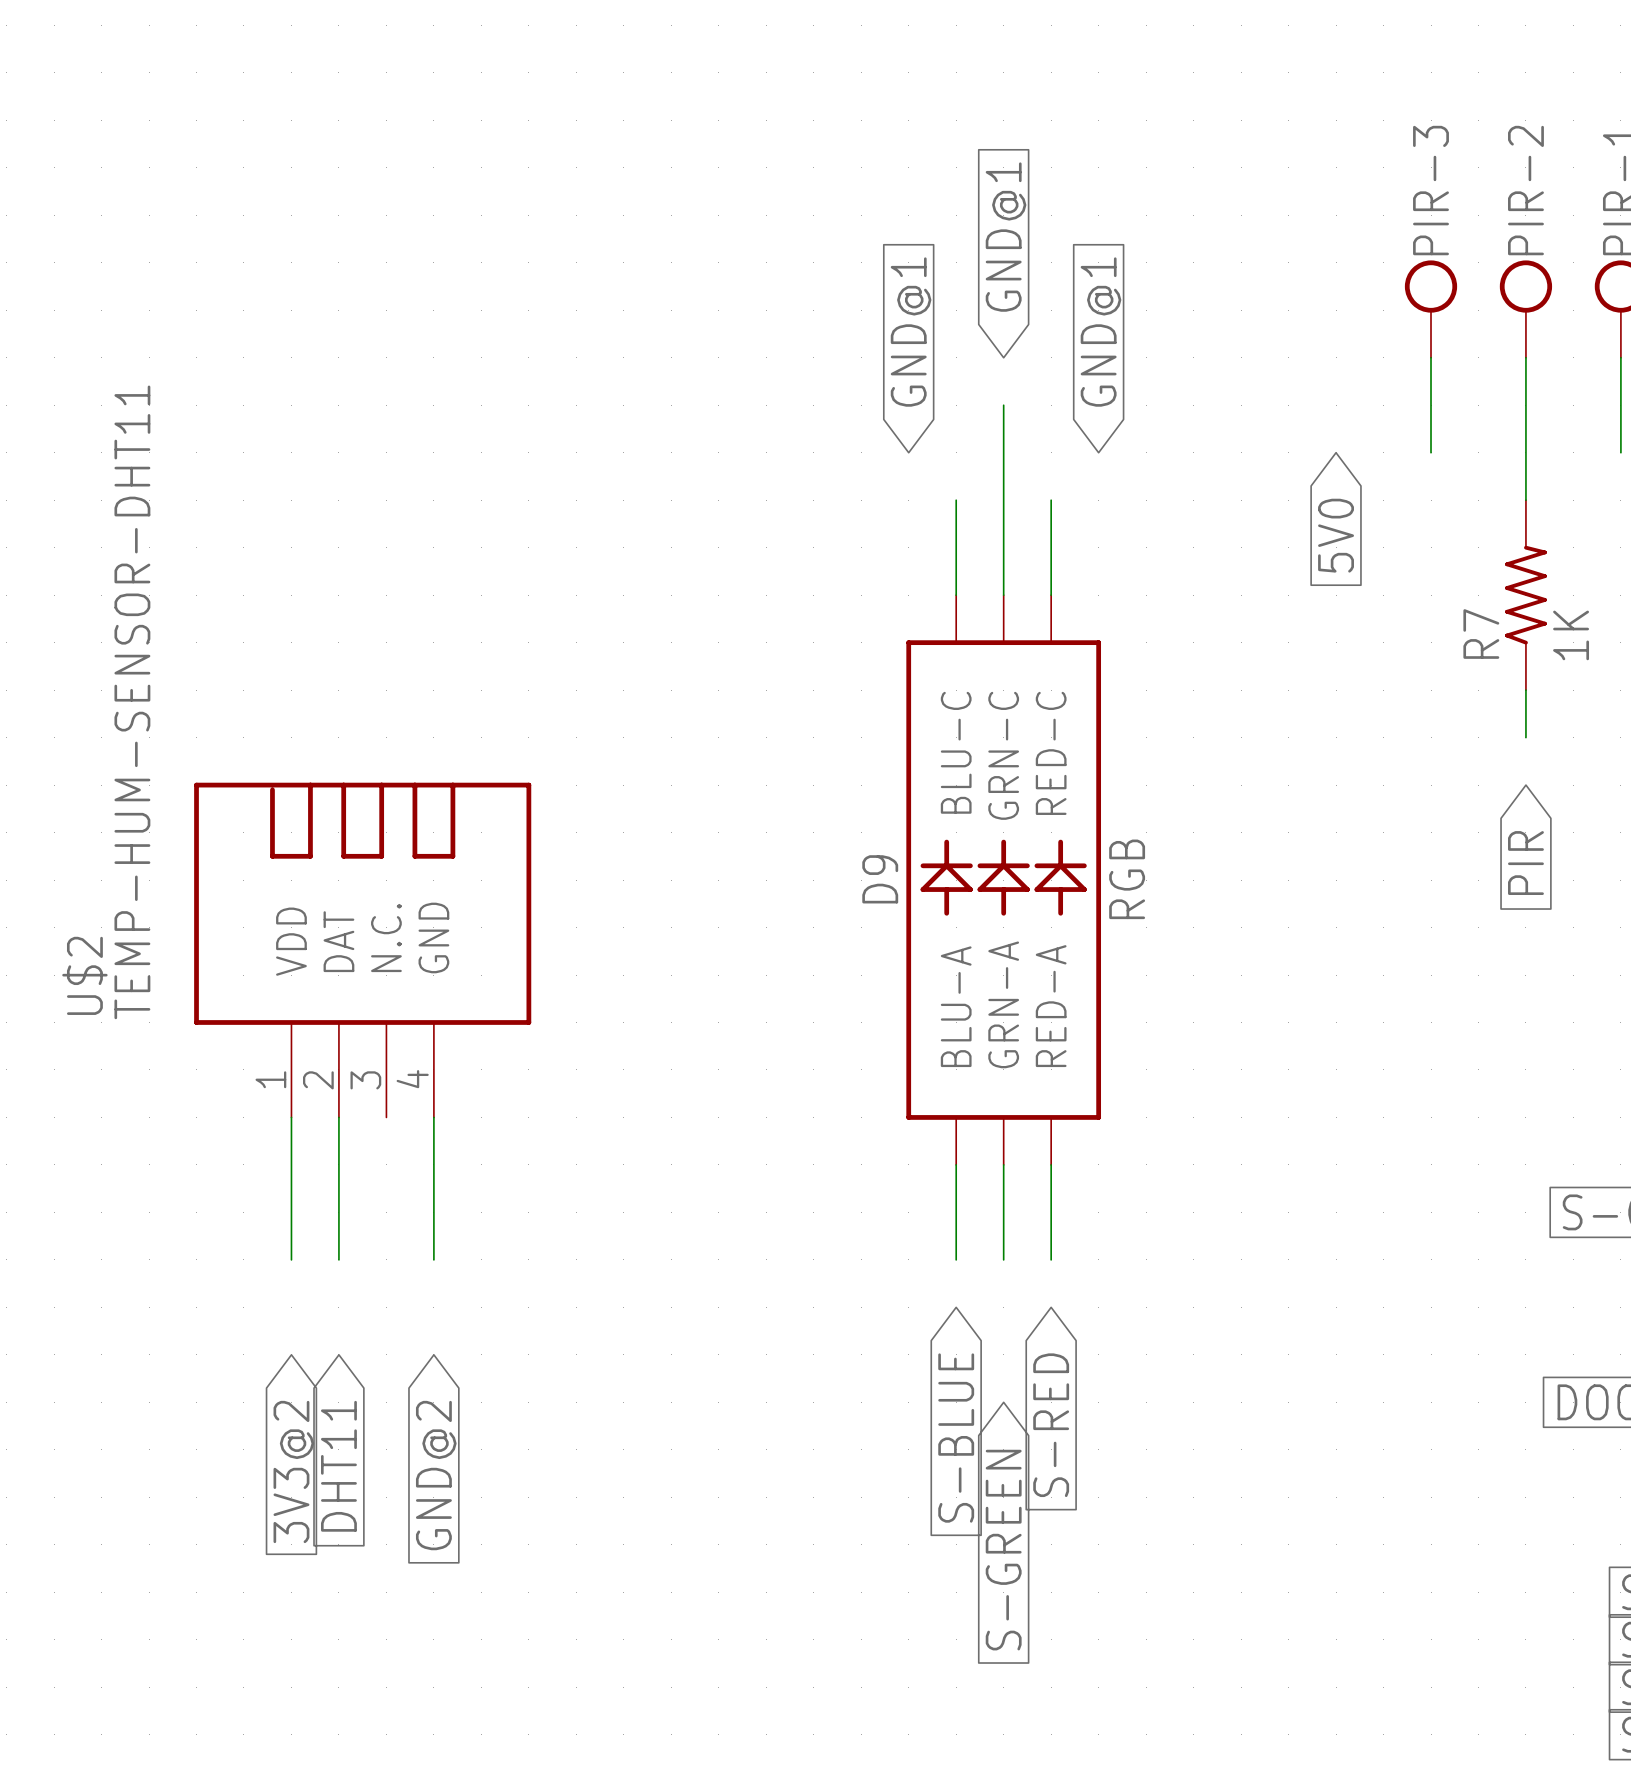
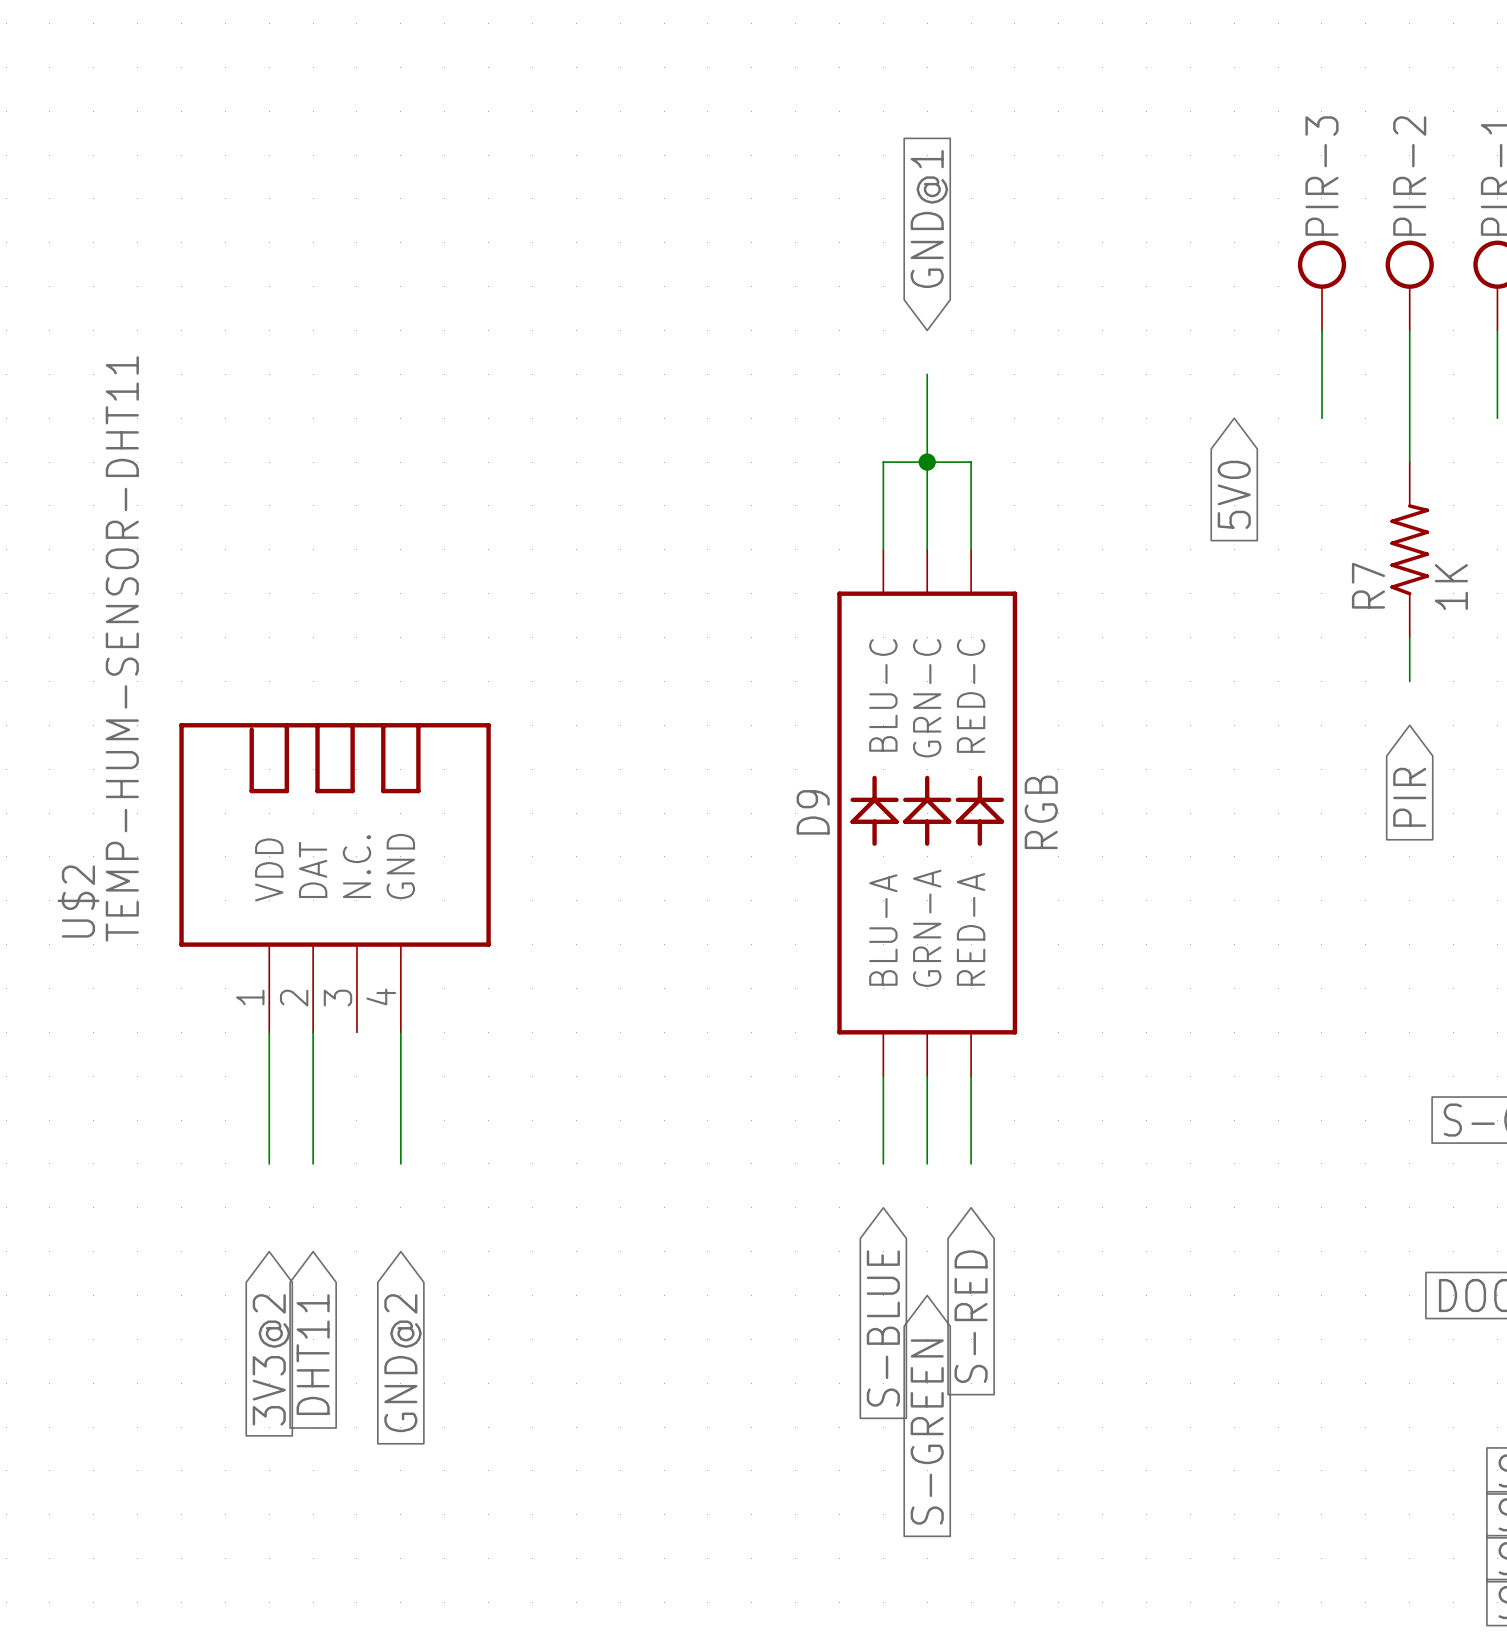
global label: GND@1 (911, 332) -> none
global label: GND@1 (1101, 332) -> none
wire: none -> (883, 462) (971, 462)
junction: none -> (927, 462)

